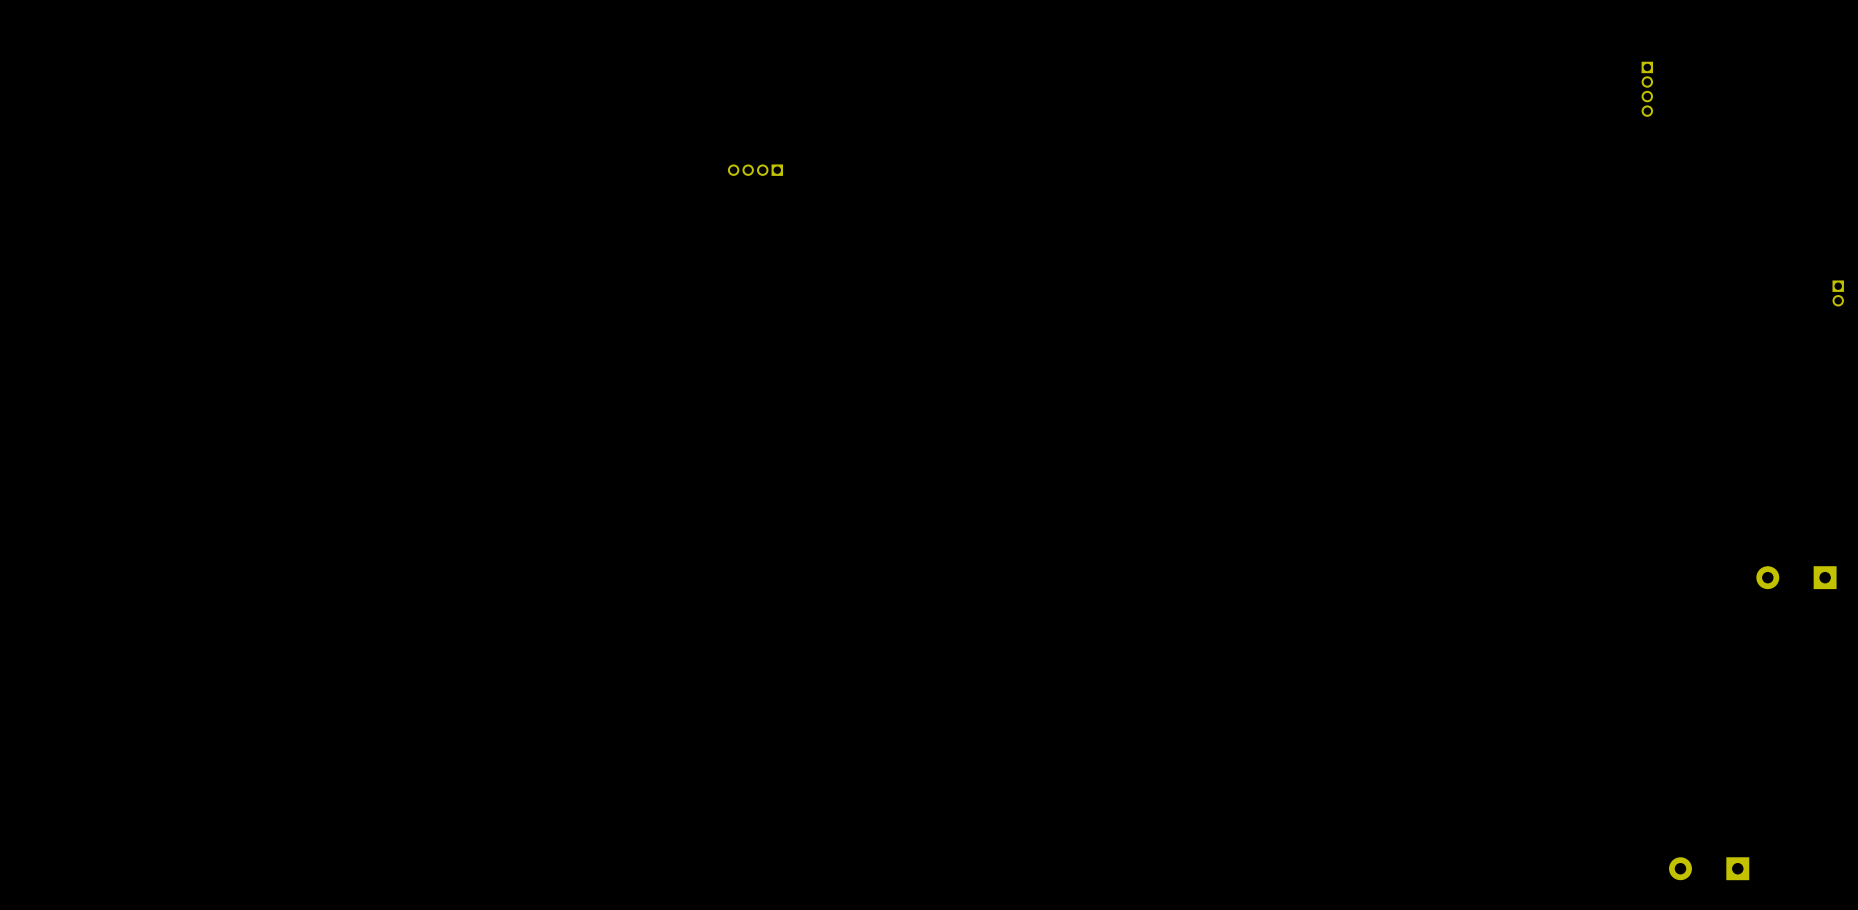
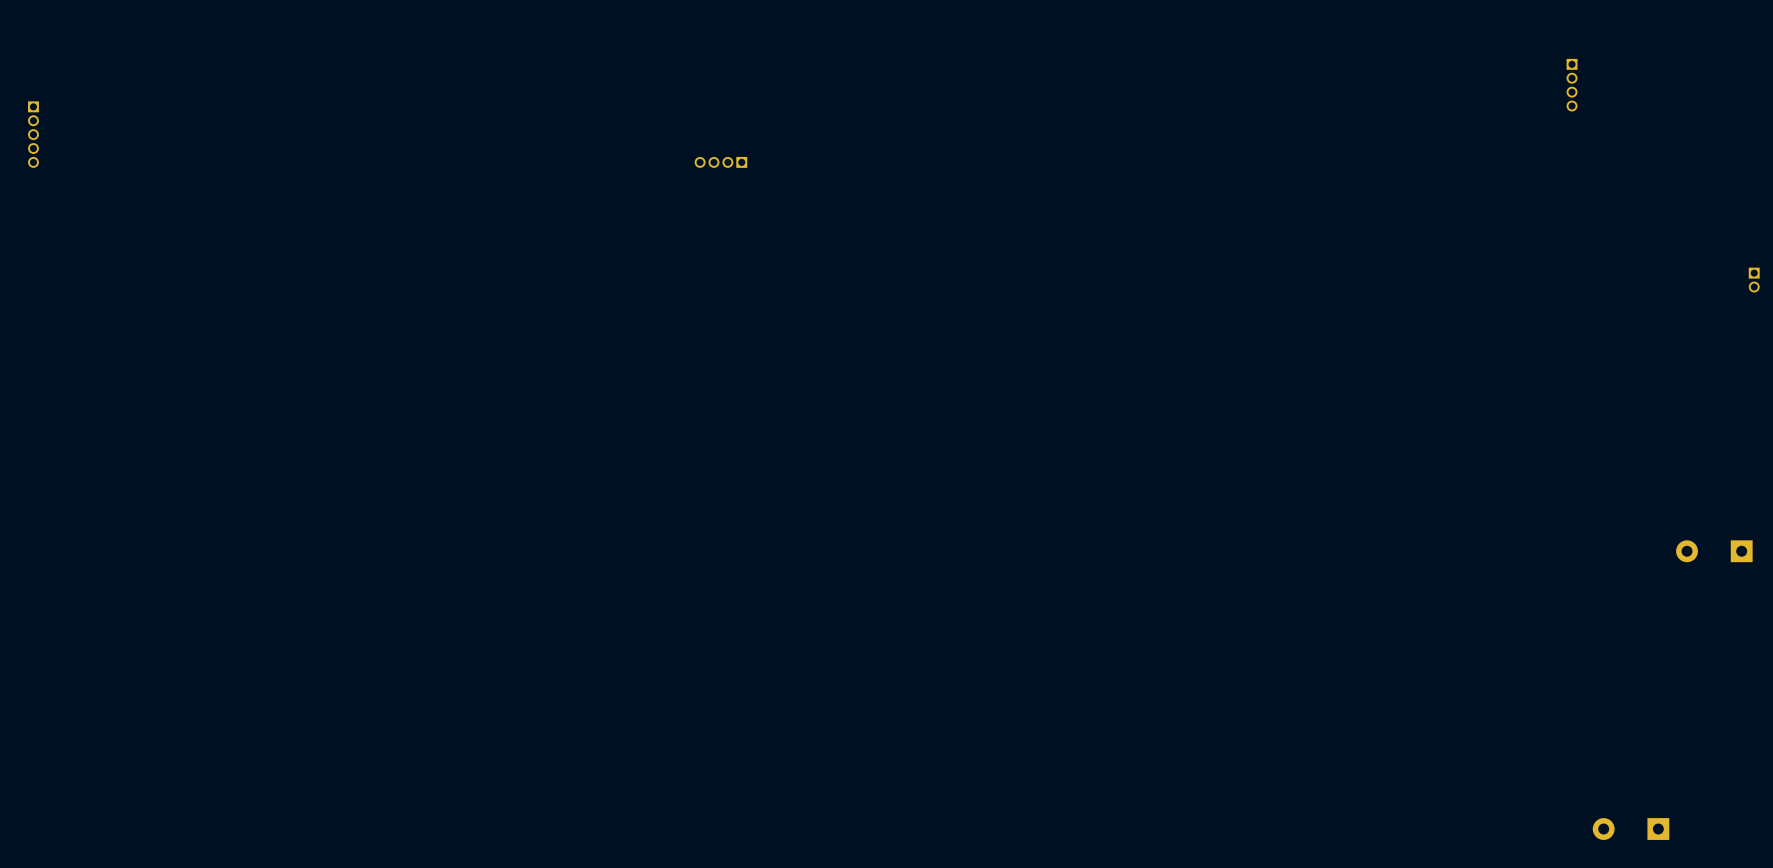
part: none -> (33, 134)

